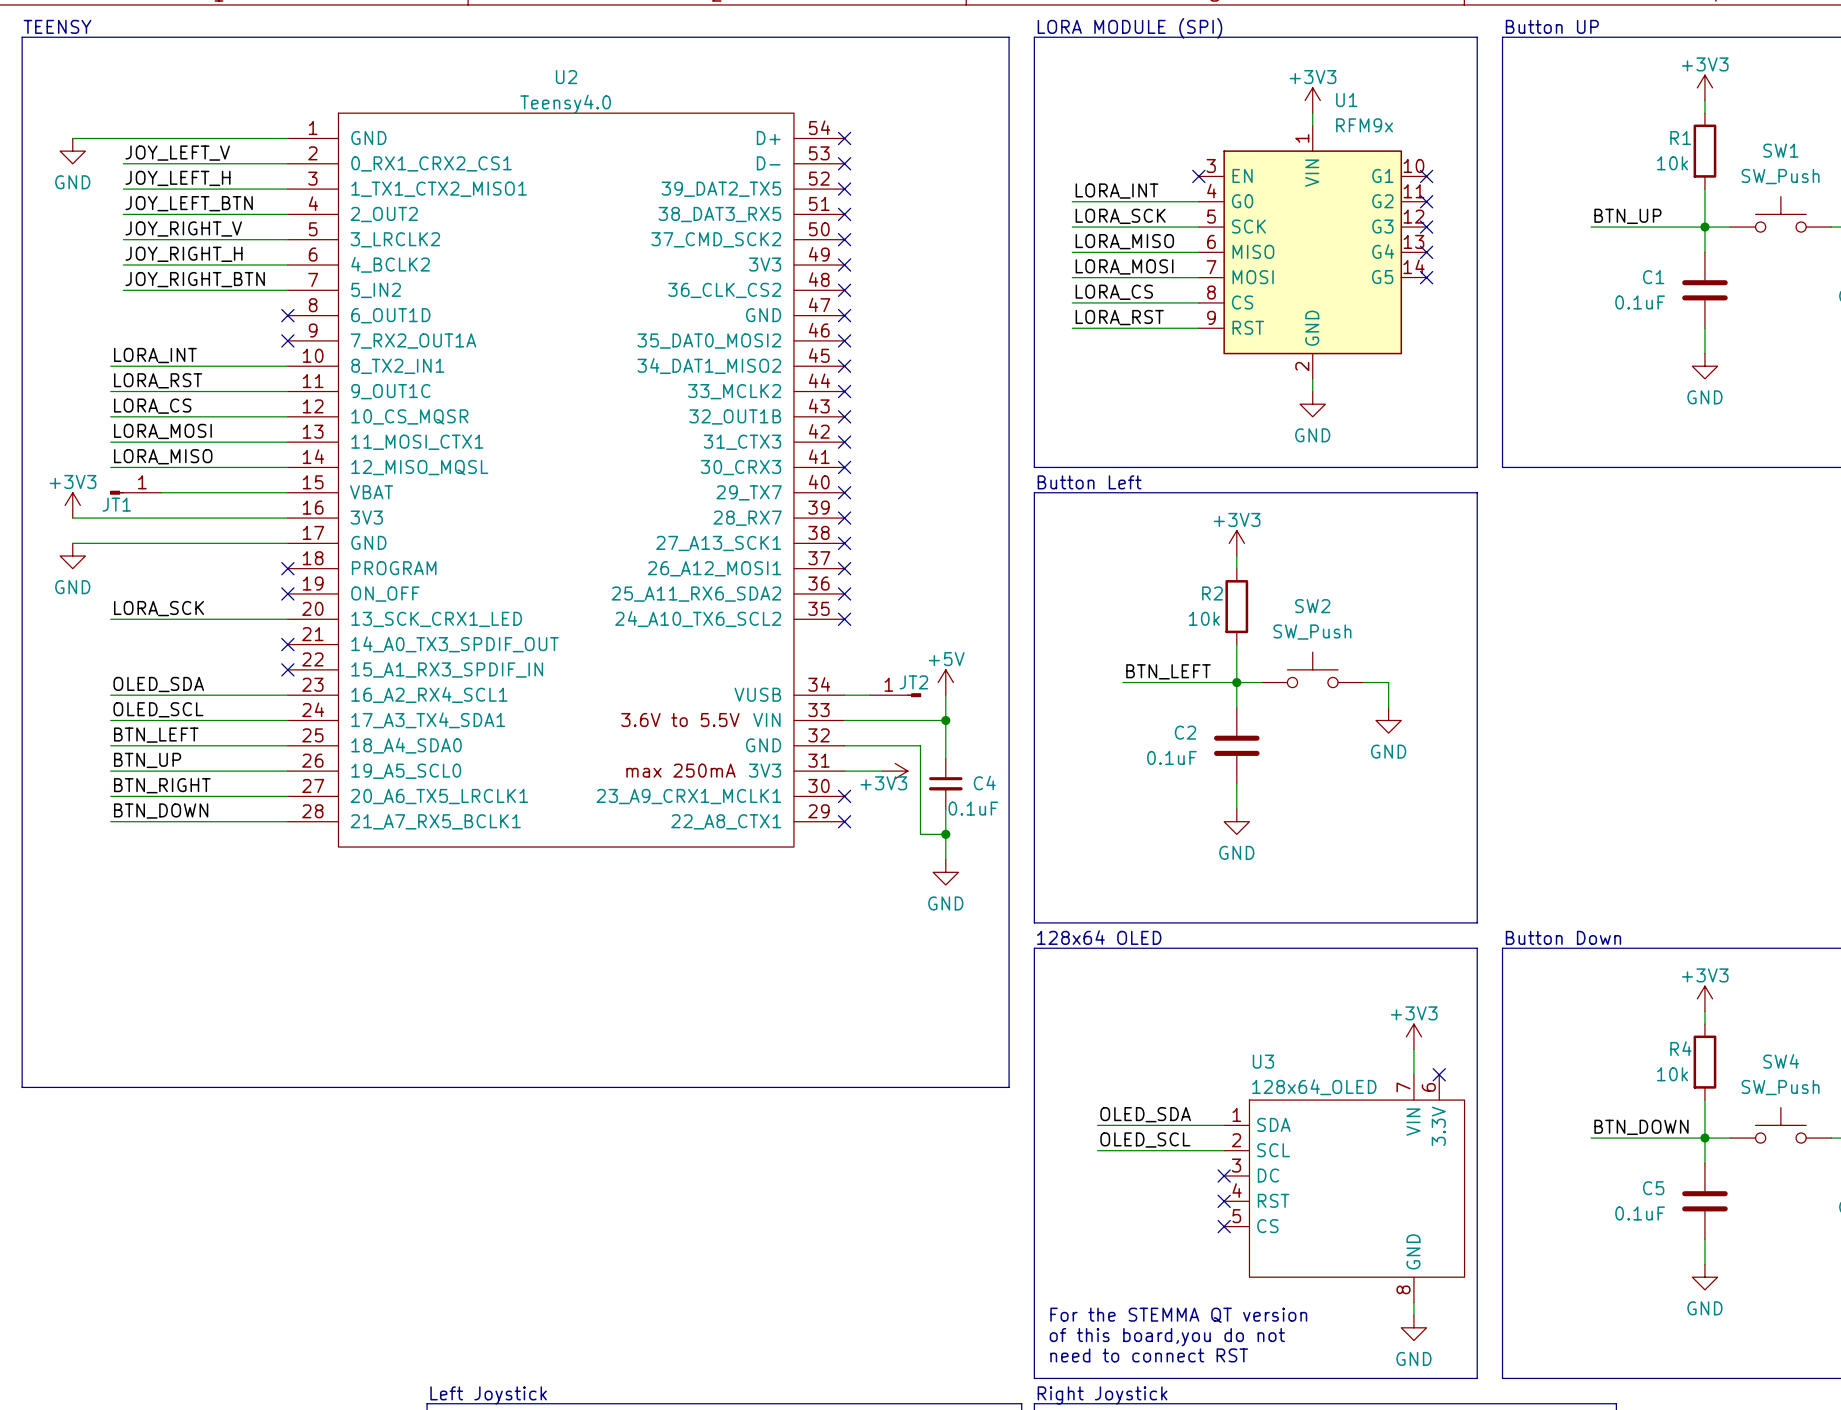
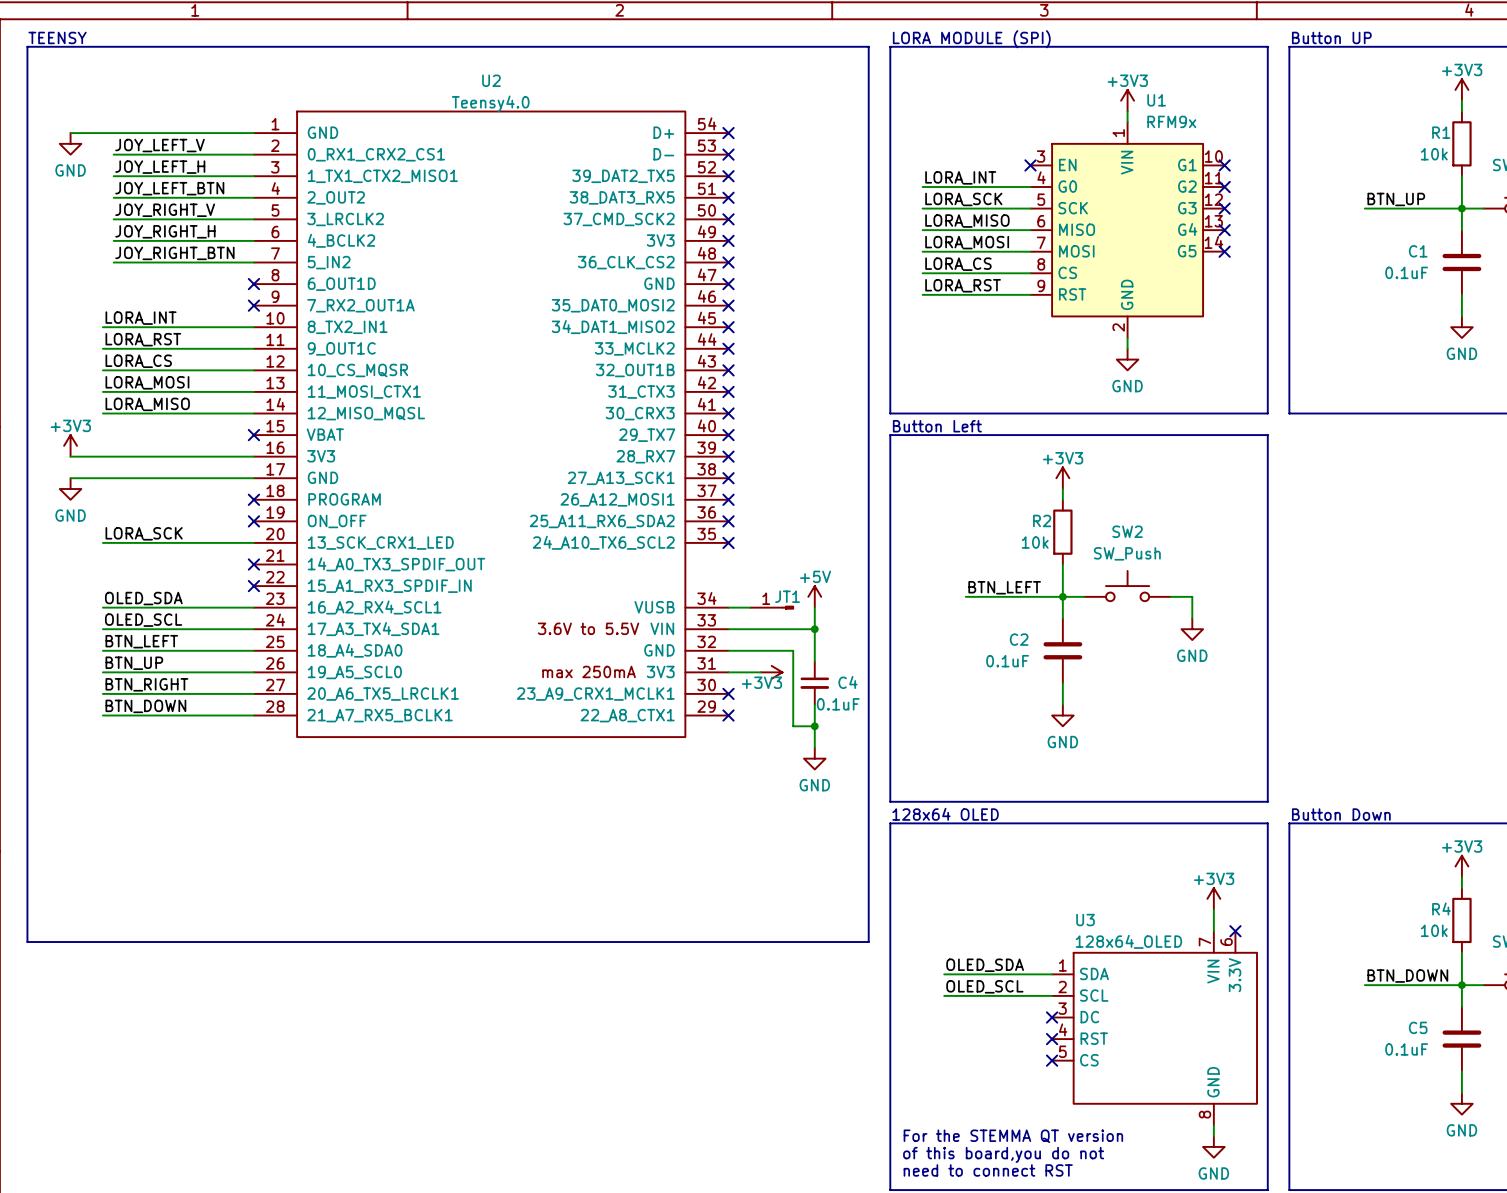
JT1: (135, 492) -> none
wire: (161, 492) (287, 492) -> none
no-connect mark: none -> (253, 435)
JT2 name: JT2 (913, 682) -> JT1 (787, 596)

